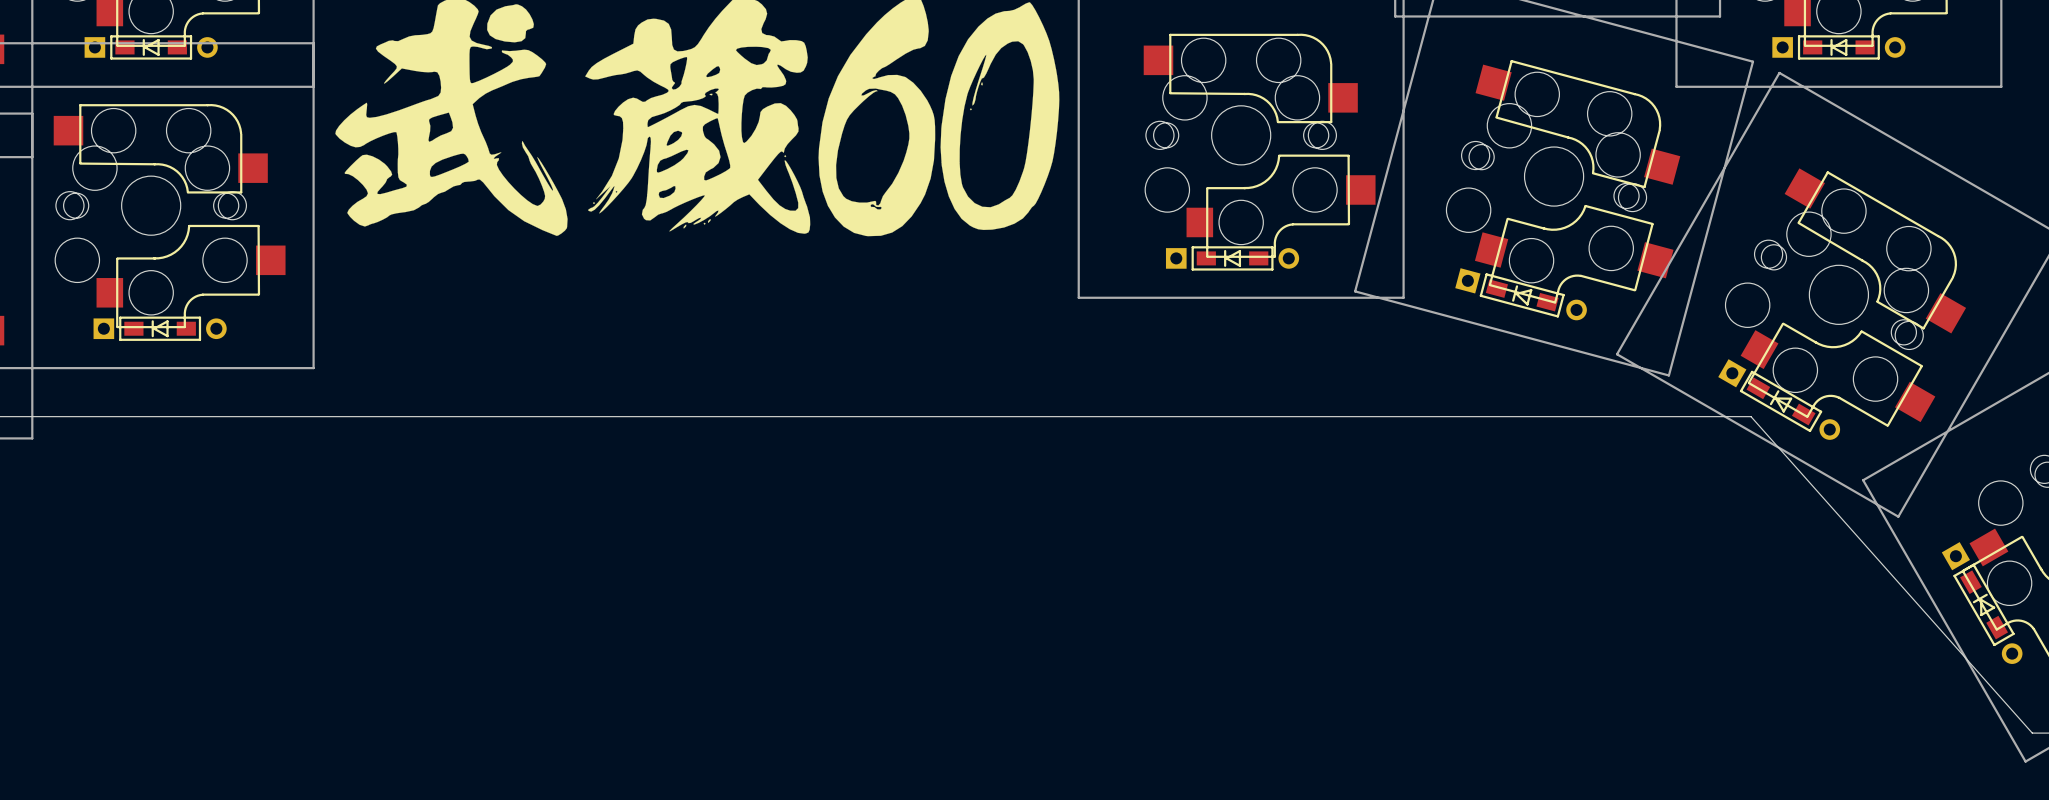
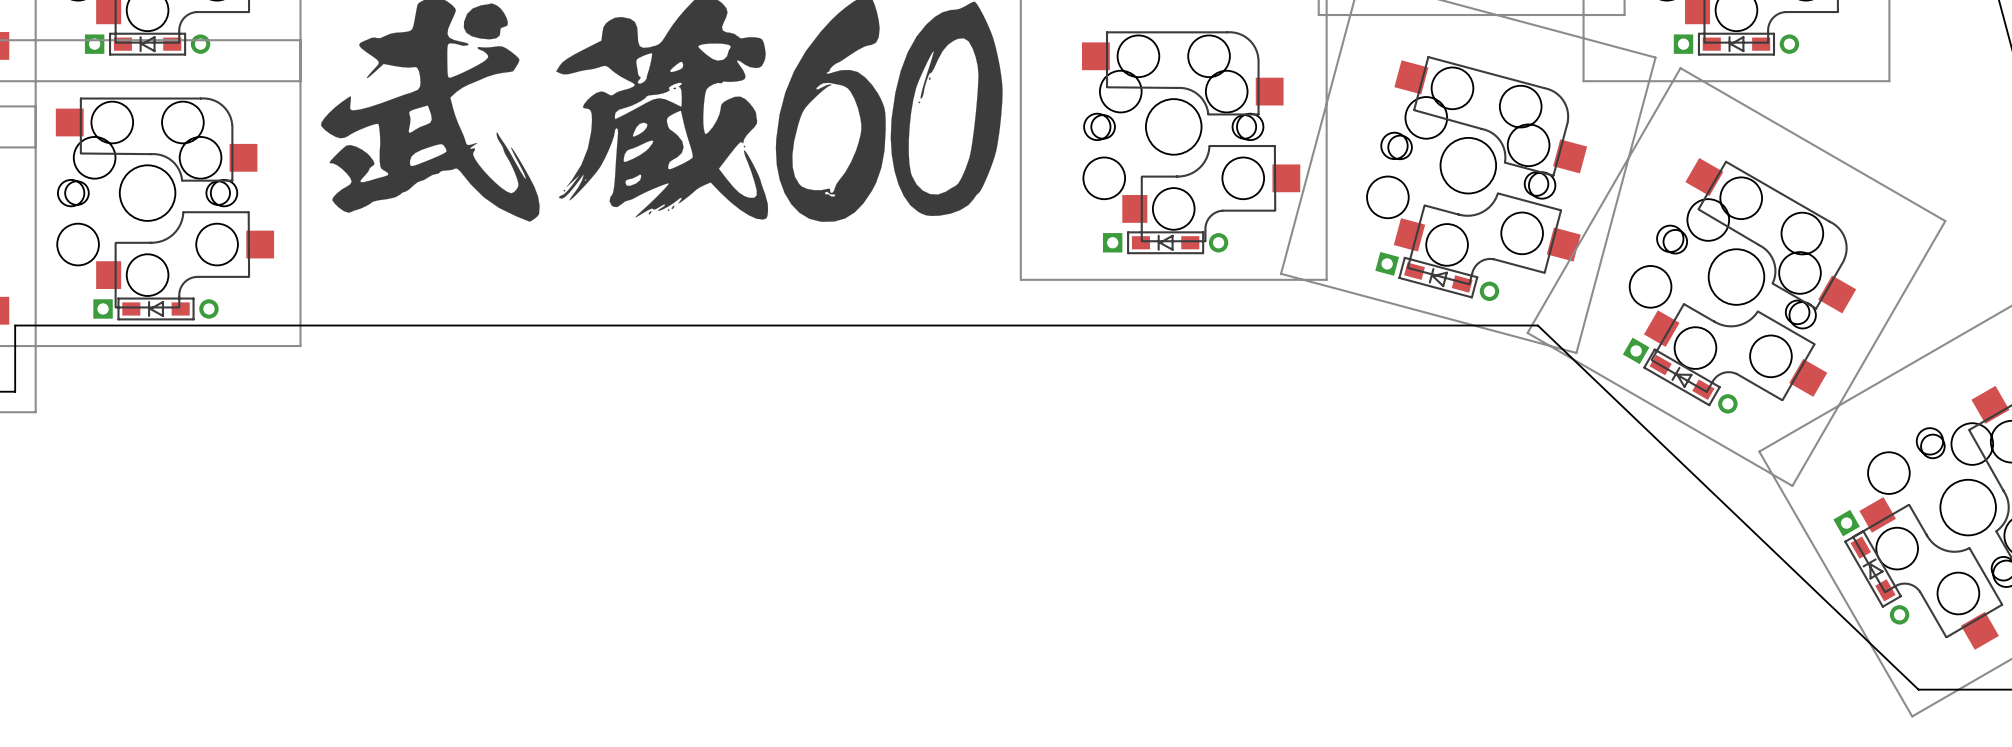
board edge: (10, 416) (1751, 416) (2032, 733) -> (15, 391) (15, 325) (1537, 325) (1918, 689)

